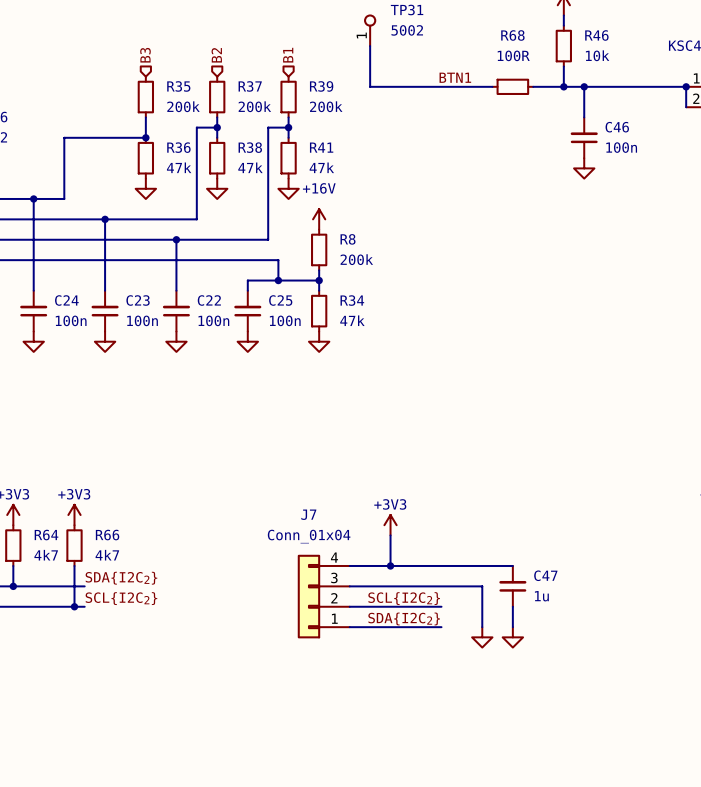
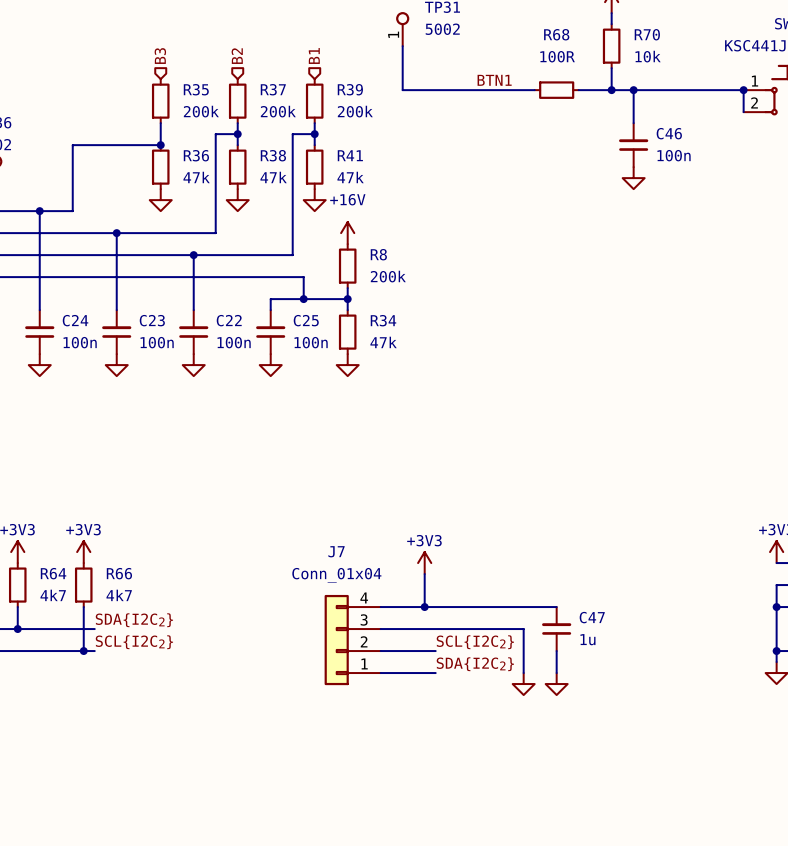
R46 name: R46 (596, 35) -> R70 (647, 34)
label position: SCL{I2C2} (404, 598) -> SCL{I2C2} (475, 642)
wire: (400, 606) (441, 606) -> none
label position: SDA{I2C2} (404, 618) -> SDA{I2C2} (475, 664)
wire: (400, 627) (441, 627) -> none

